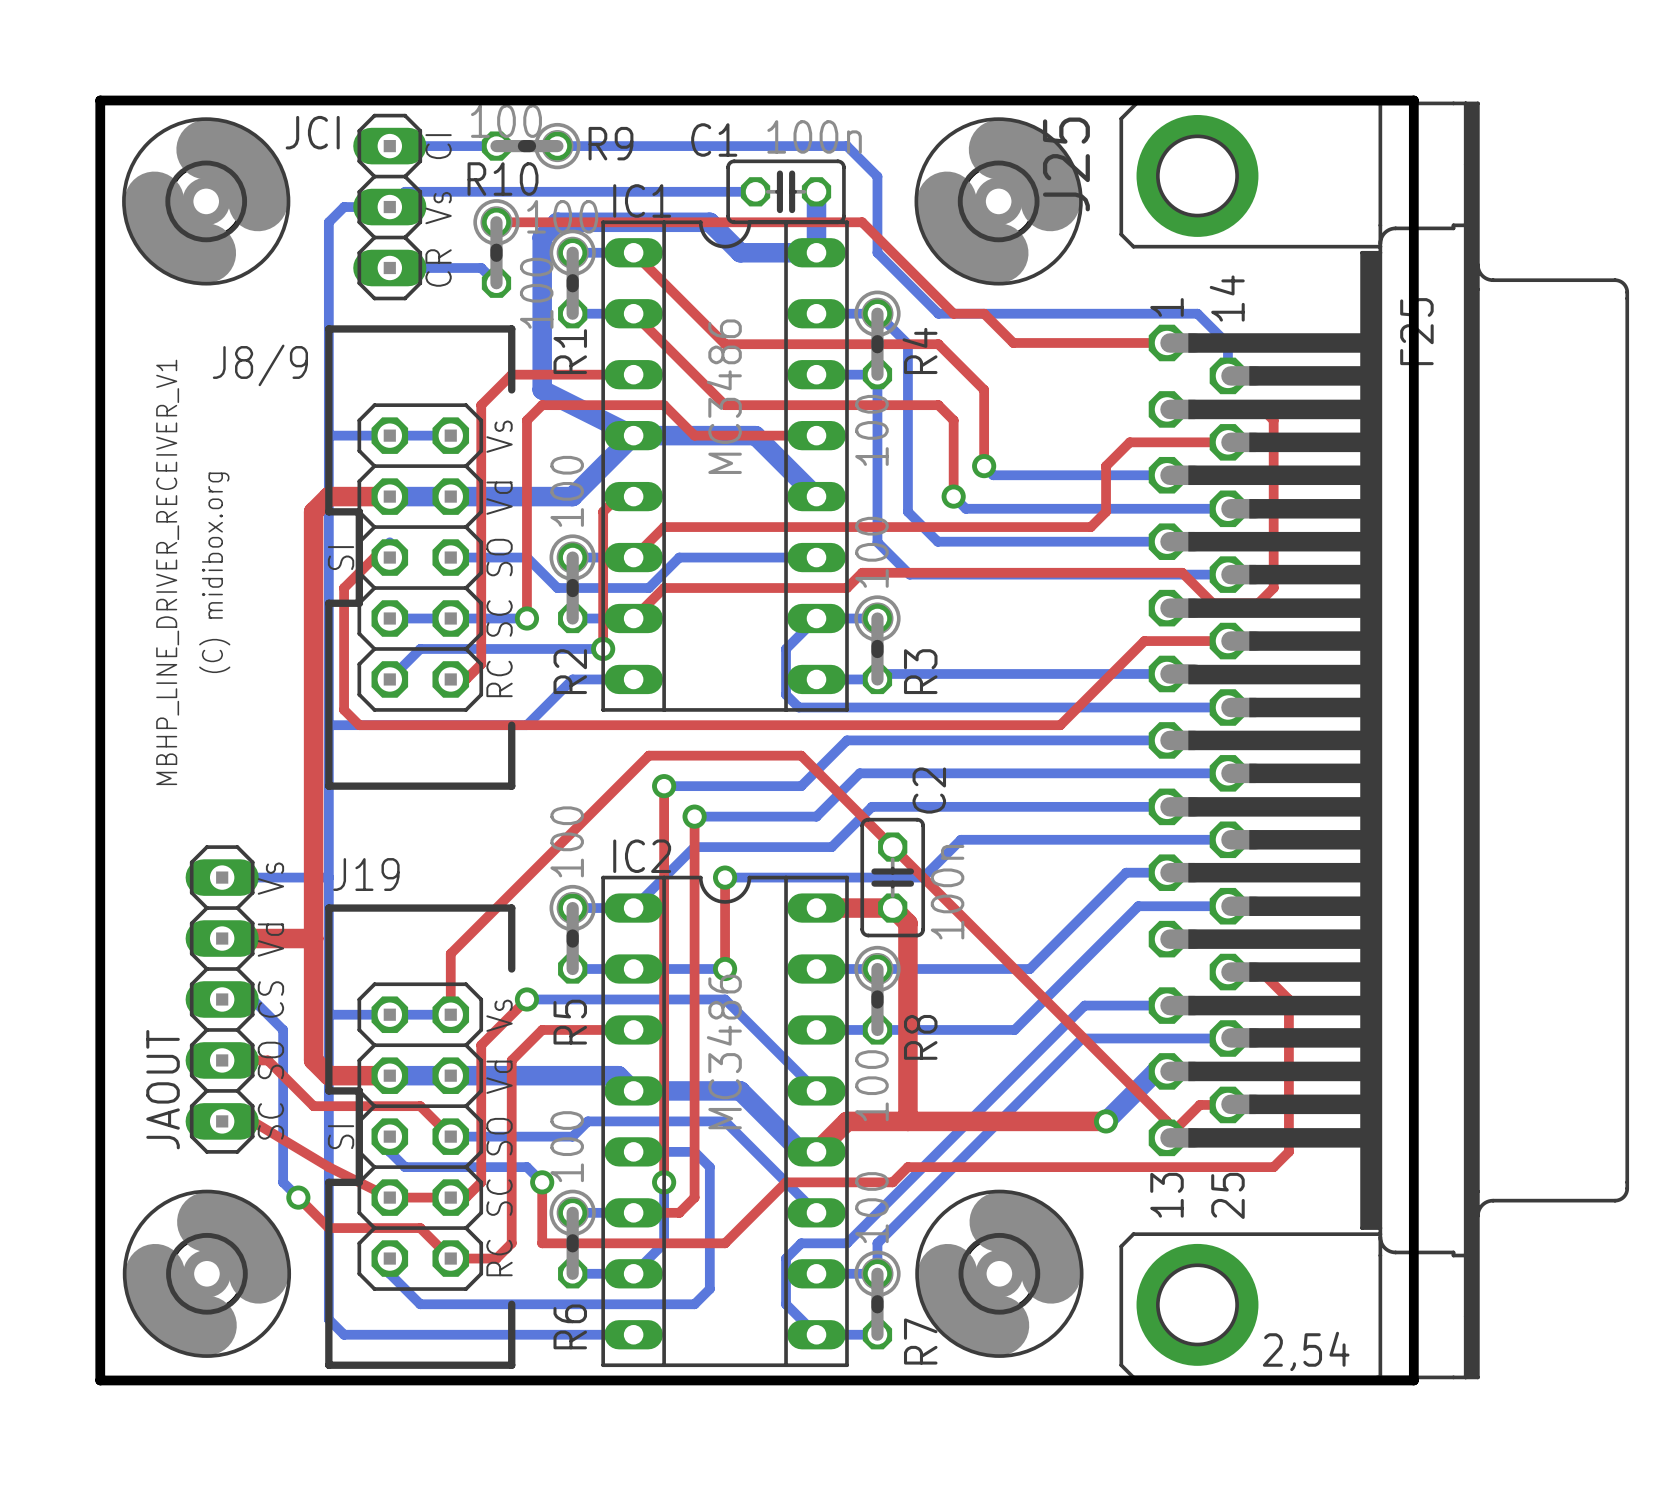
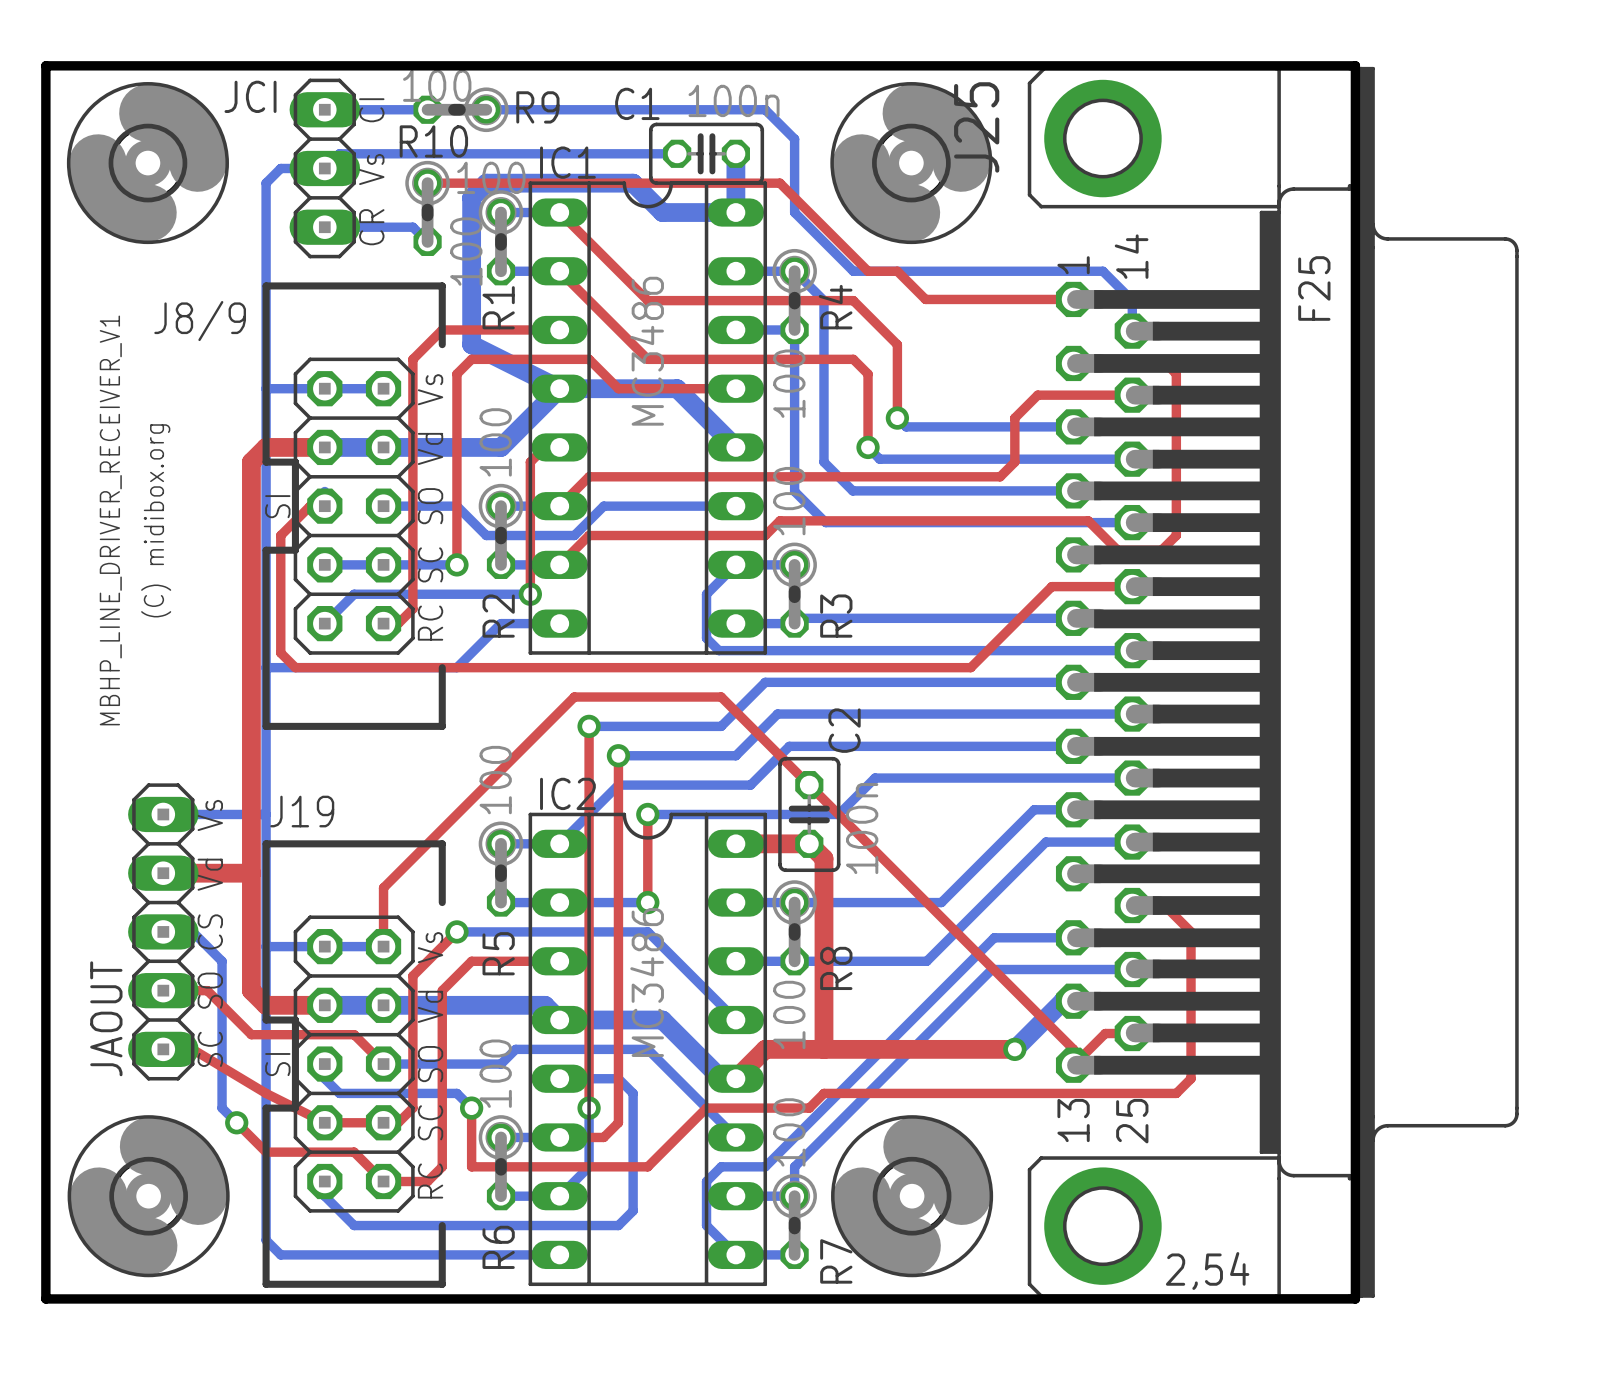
board edge: (1413, 100) (1413, 1380) -> (1311, 65) (1355, 65) (1355, 1298) (1311, 1298)

